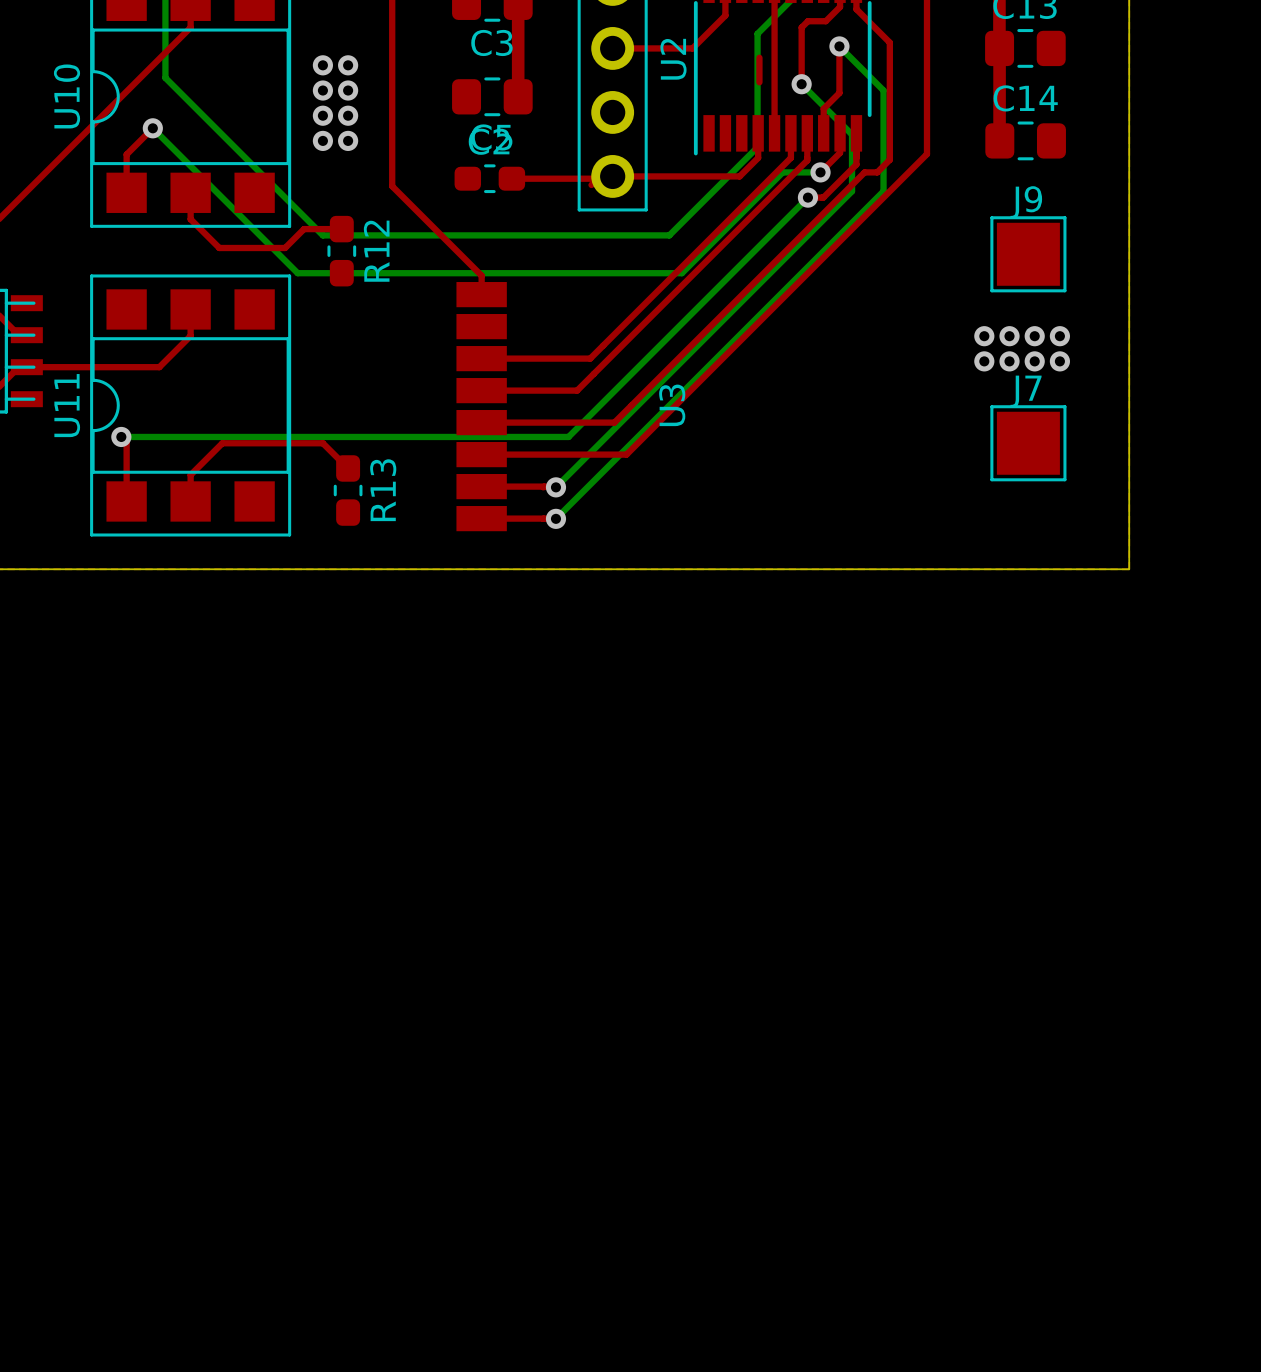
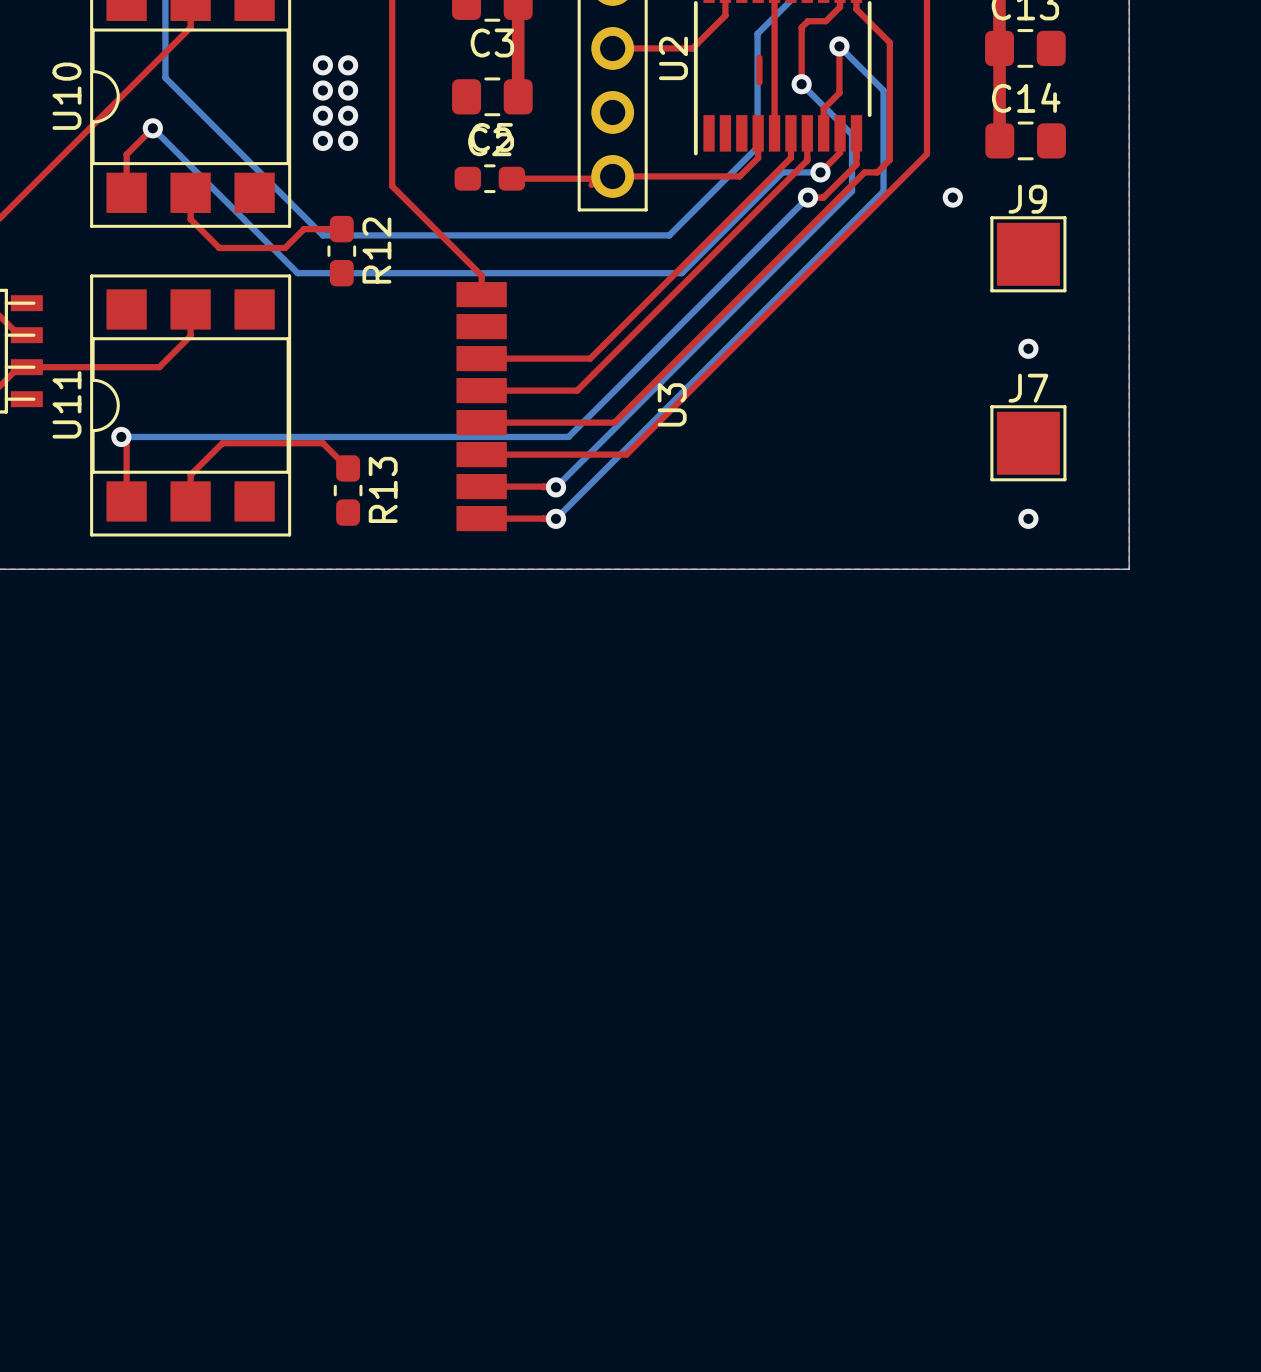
via: none -> (952, 197)
via: (984, 336) -> none
via: (1009, 336) -> none
via: (1034, 336) -> none
via: (1059, 336) -> none
via: none -> (1028, 348)
via: (984, 361) -> none
via: (1009, 361) -> none
via: (1034, 361) -> none
via: (1059, 361) -> none
via: none -> (1028, 518)

